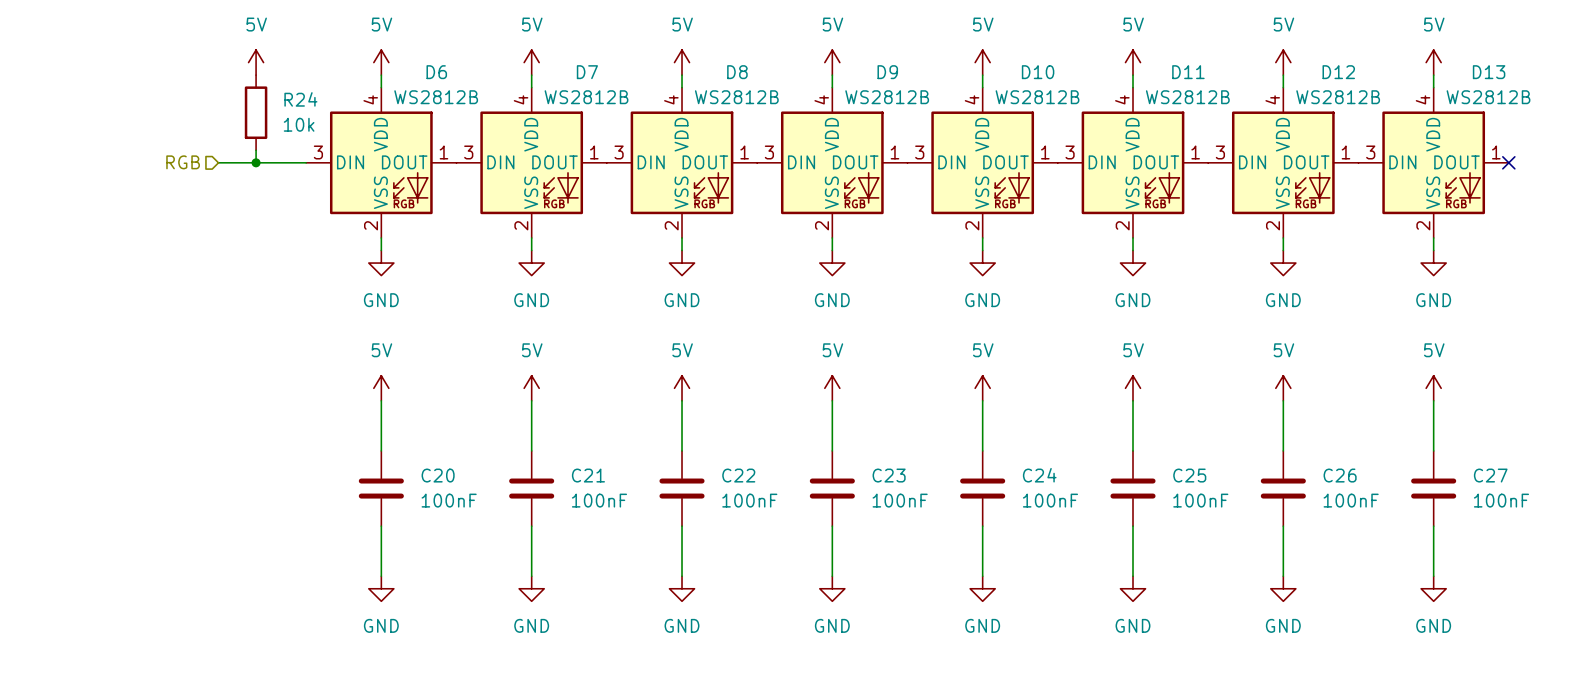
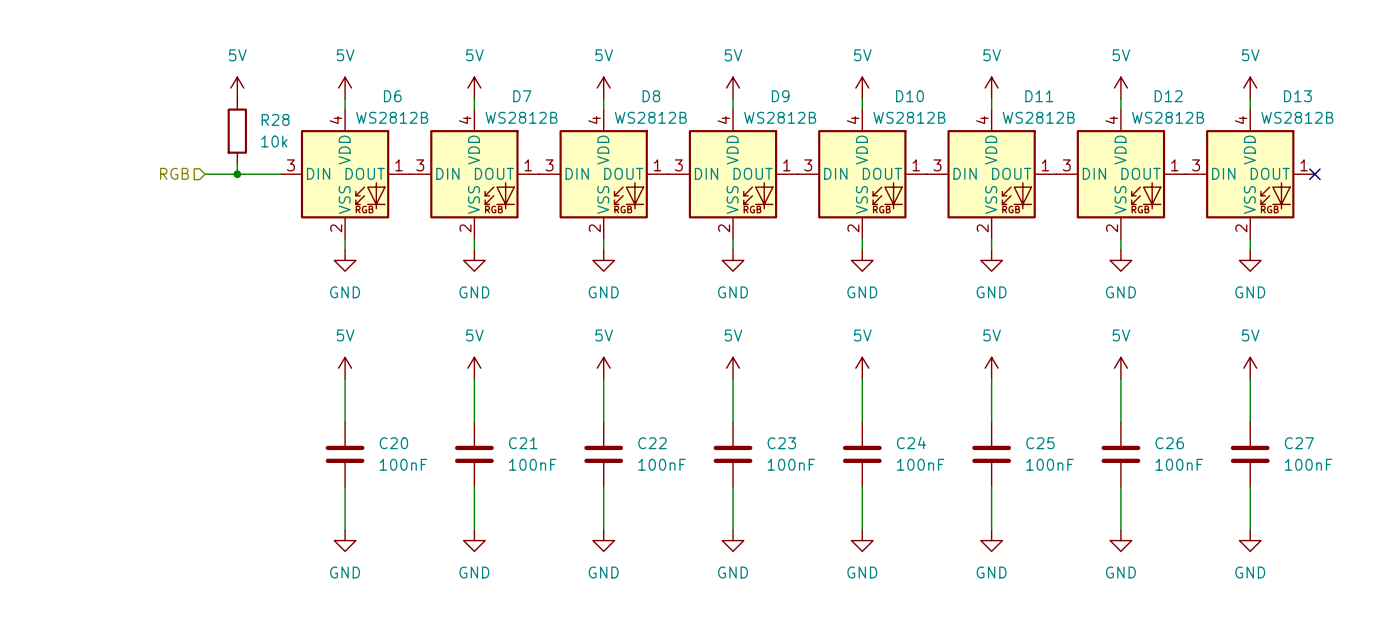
R24 name: R24 (300, 99) -> R28 (275, 119)

